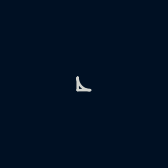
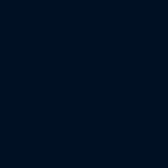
board edge: (77, 77) (77, 90) (90, 90) (81, 86) (77, 77) -> none

